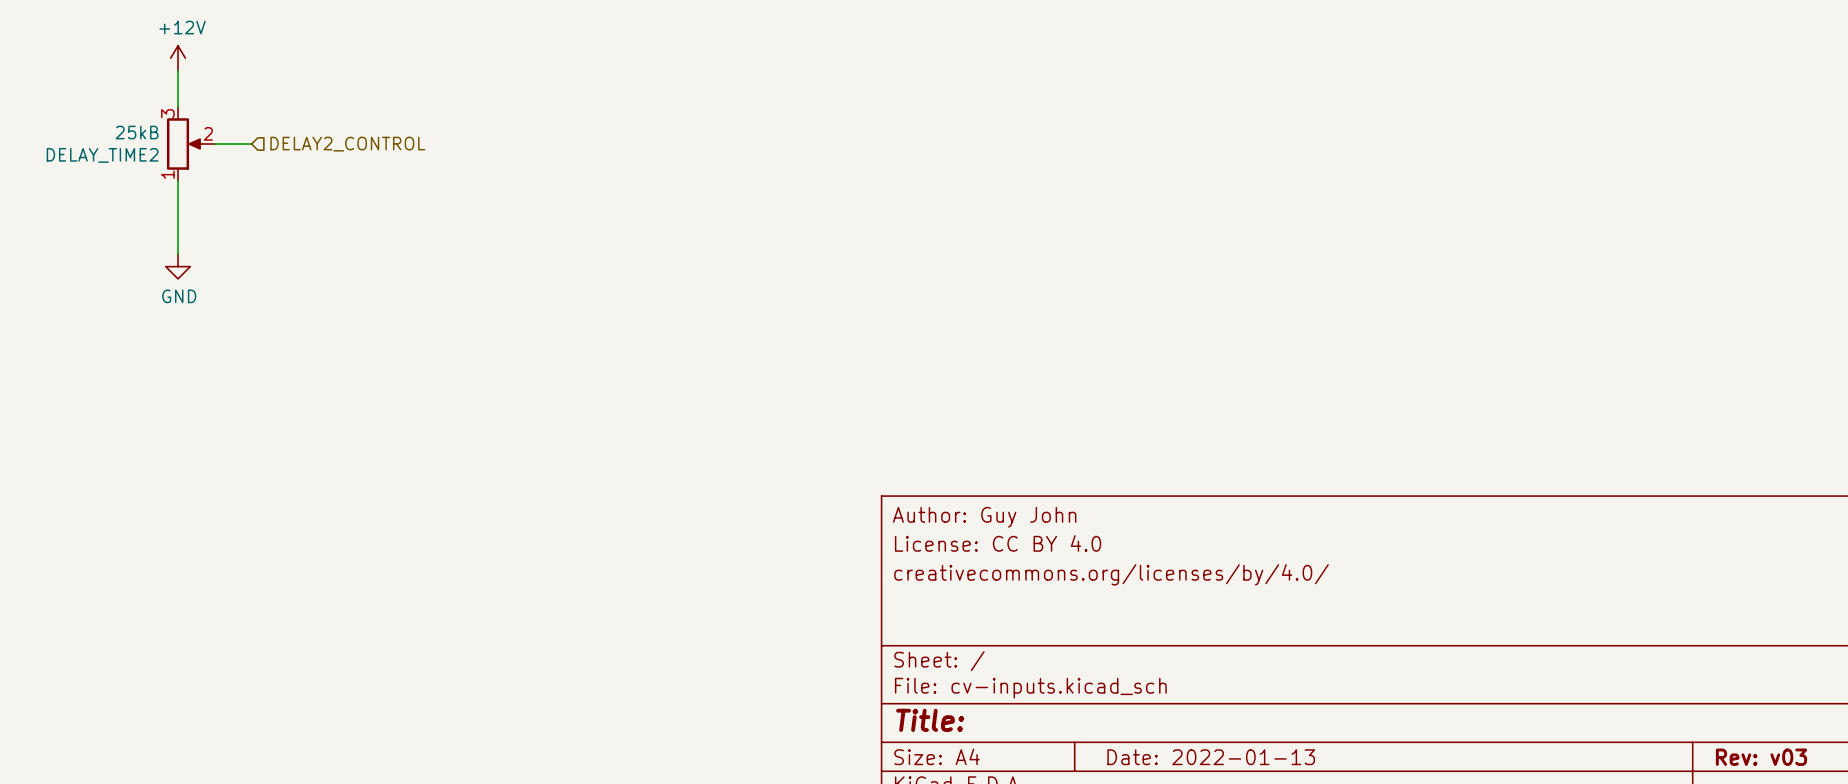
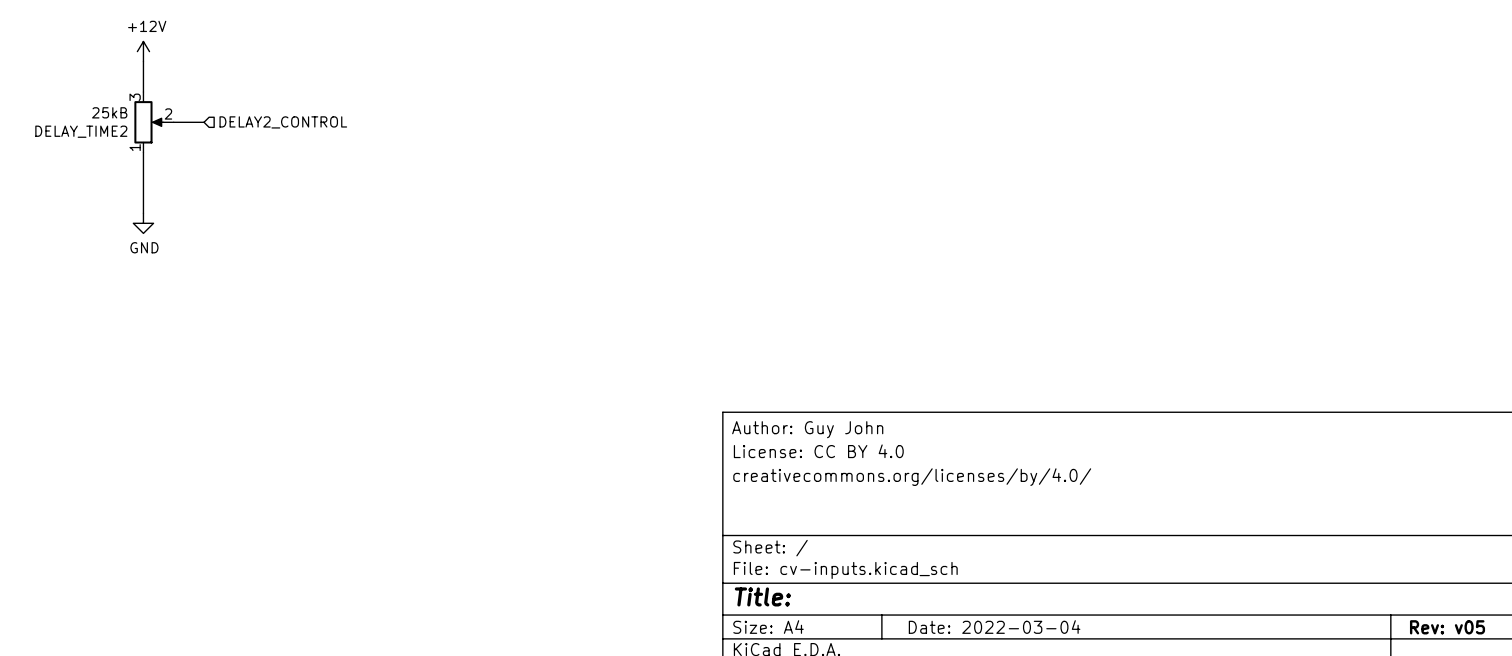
title block: Date: 2022-01-13 (1211, 757) -> Date: 2022-03-04 (994, 627)
title block: Rev: v03 (1761, 757) -> Rev: v05 (1447, 627)

